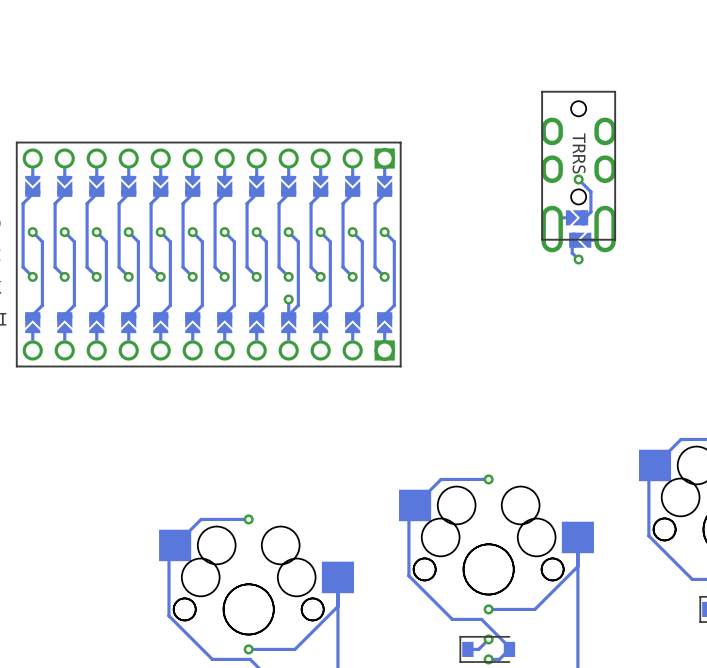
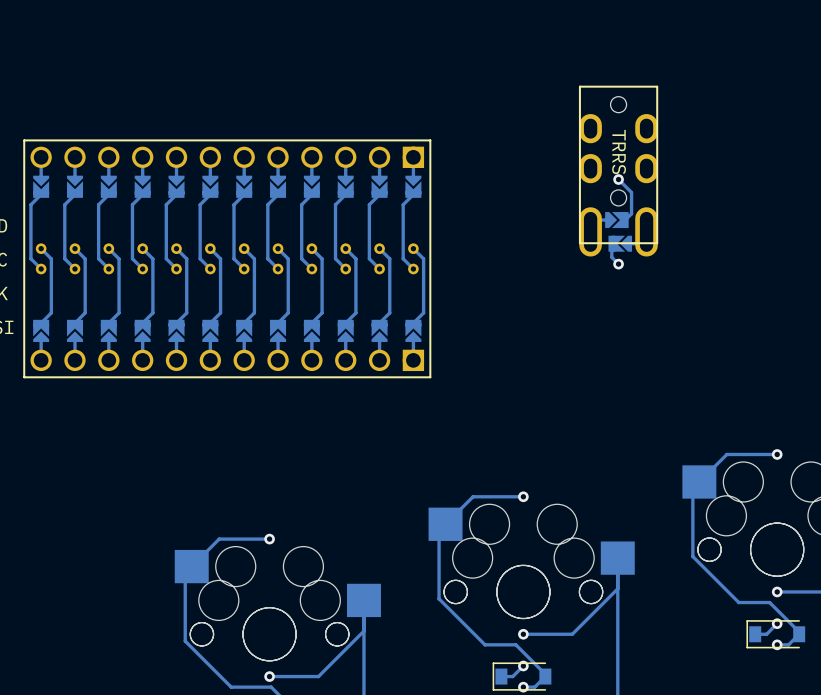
part footprint: [15, 141, 402, 368] -> [23, 139, 432, 379]
track: (288, 299) (288, 315) -> none
via: (288, 299) -> none

